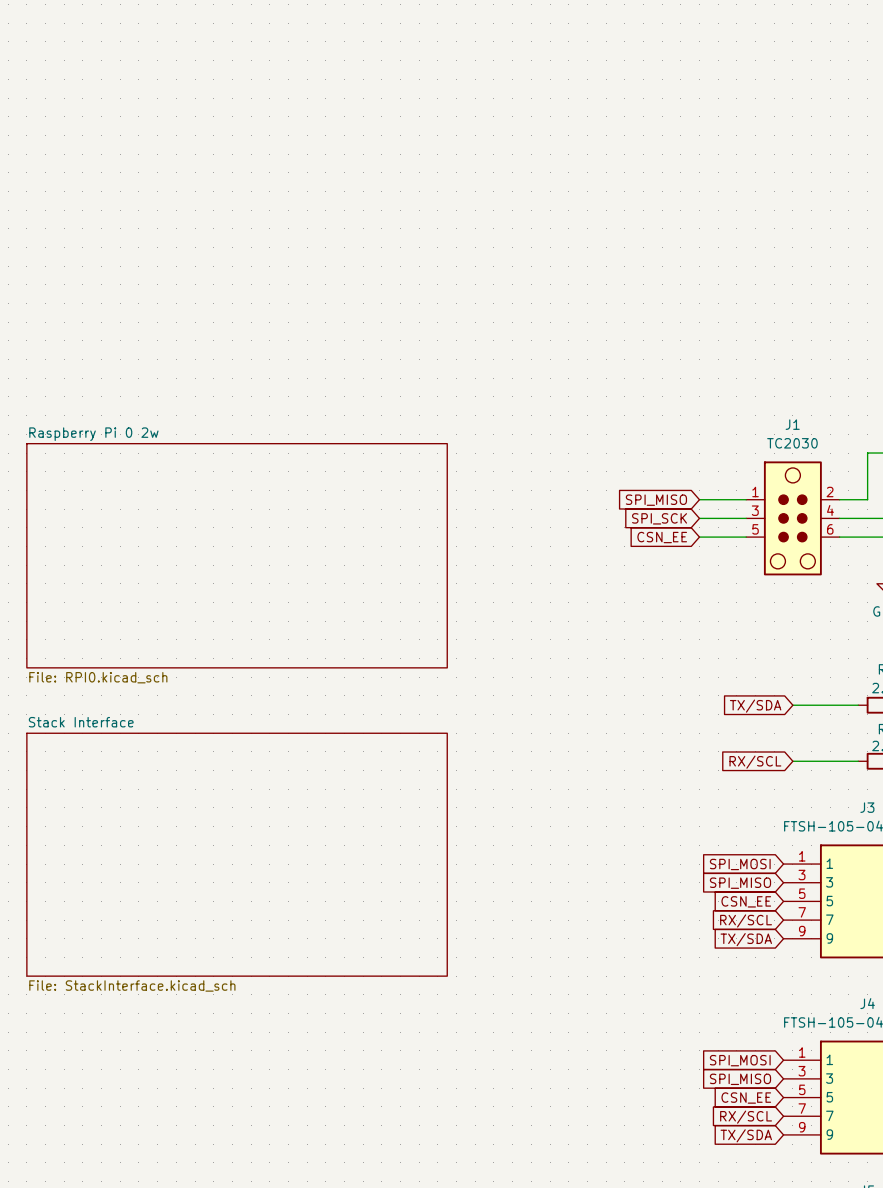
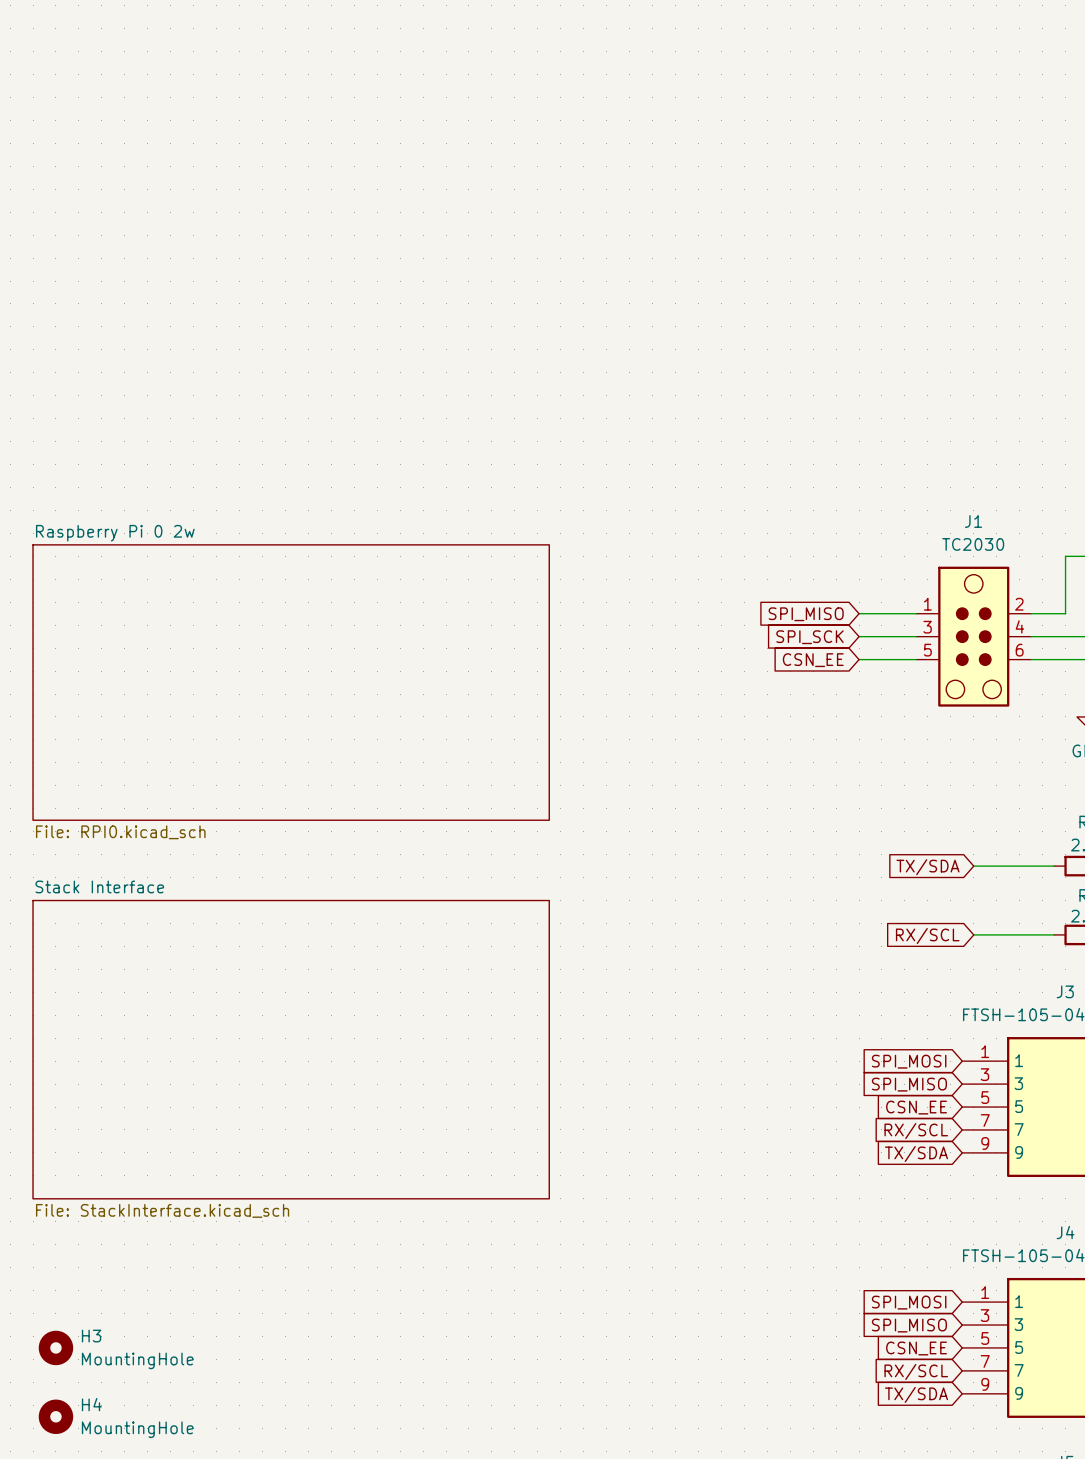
H3: none -> MountingHole (55, 1347)
H4: none -> MountingHole (55, 1416)

